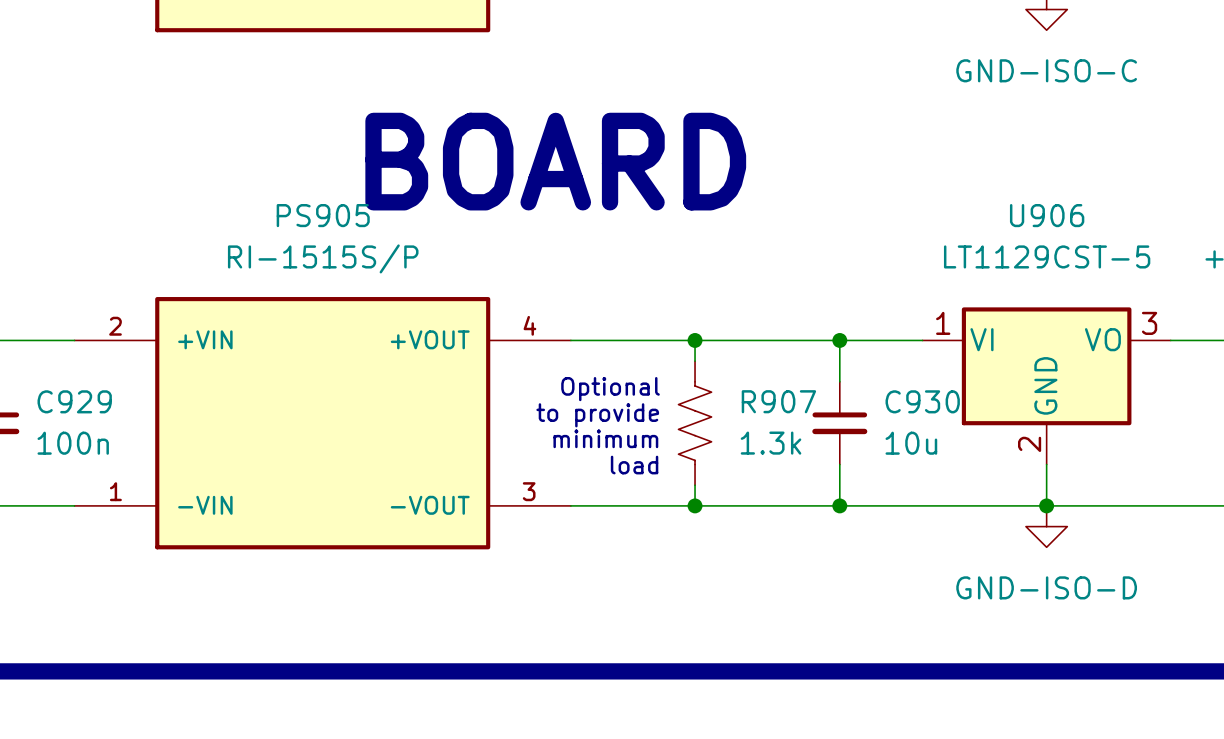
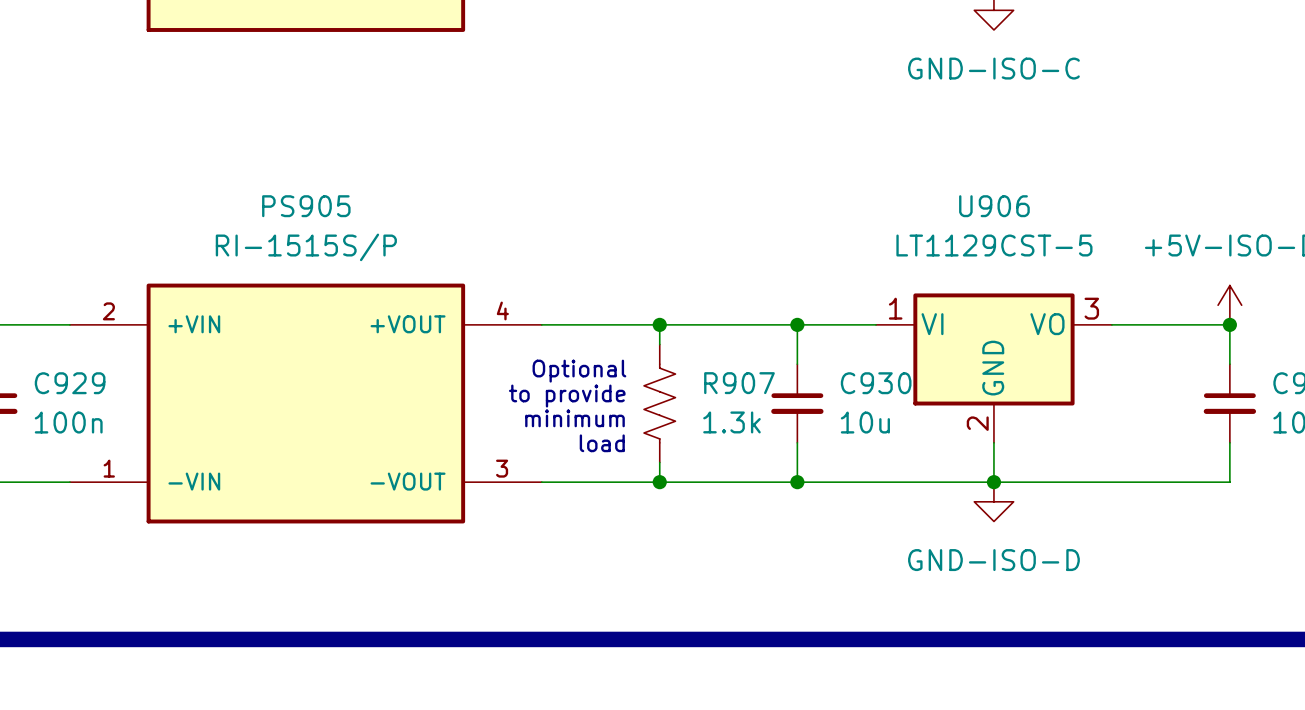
text: BOARD (555, 161) -> none

